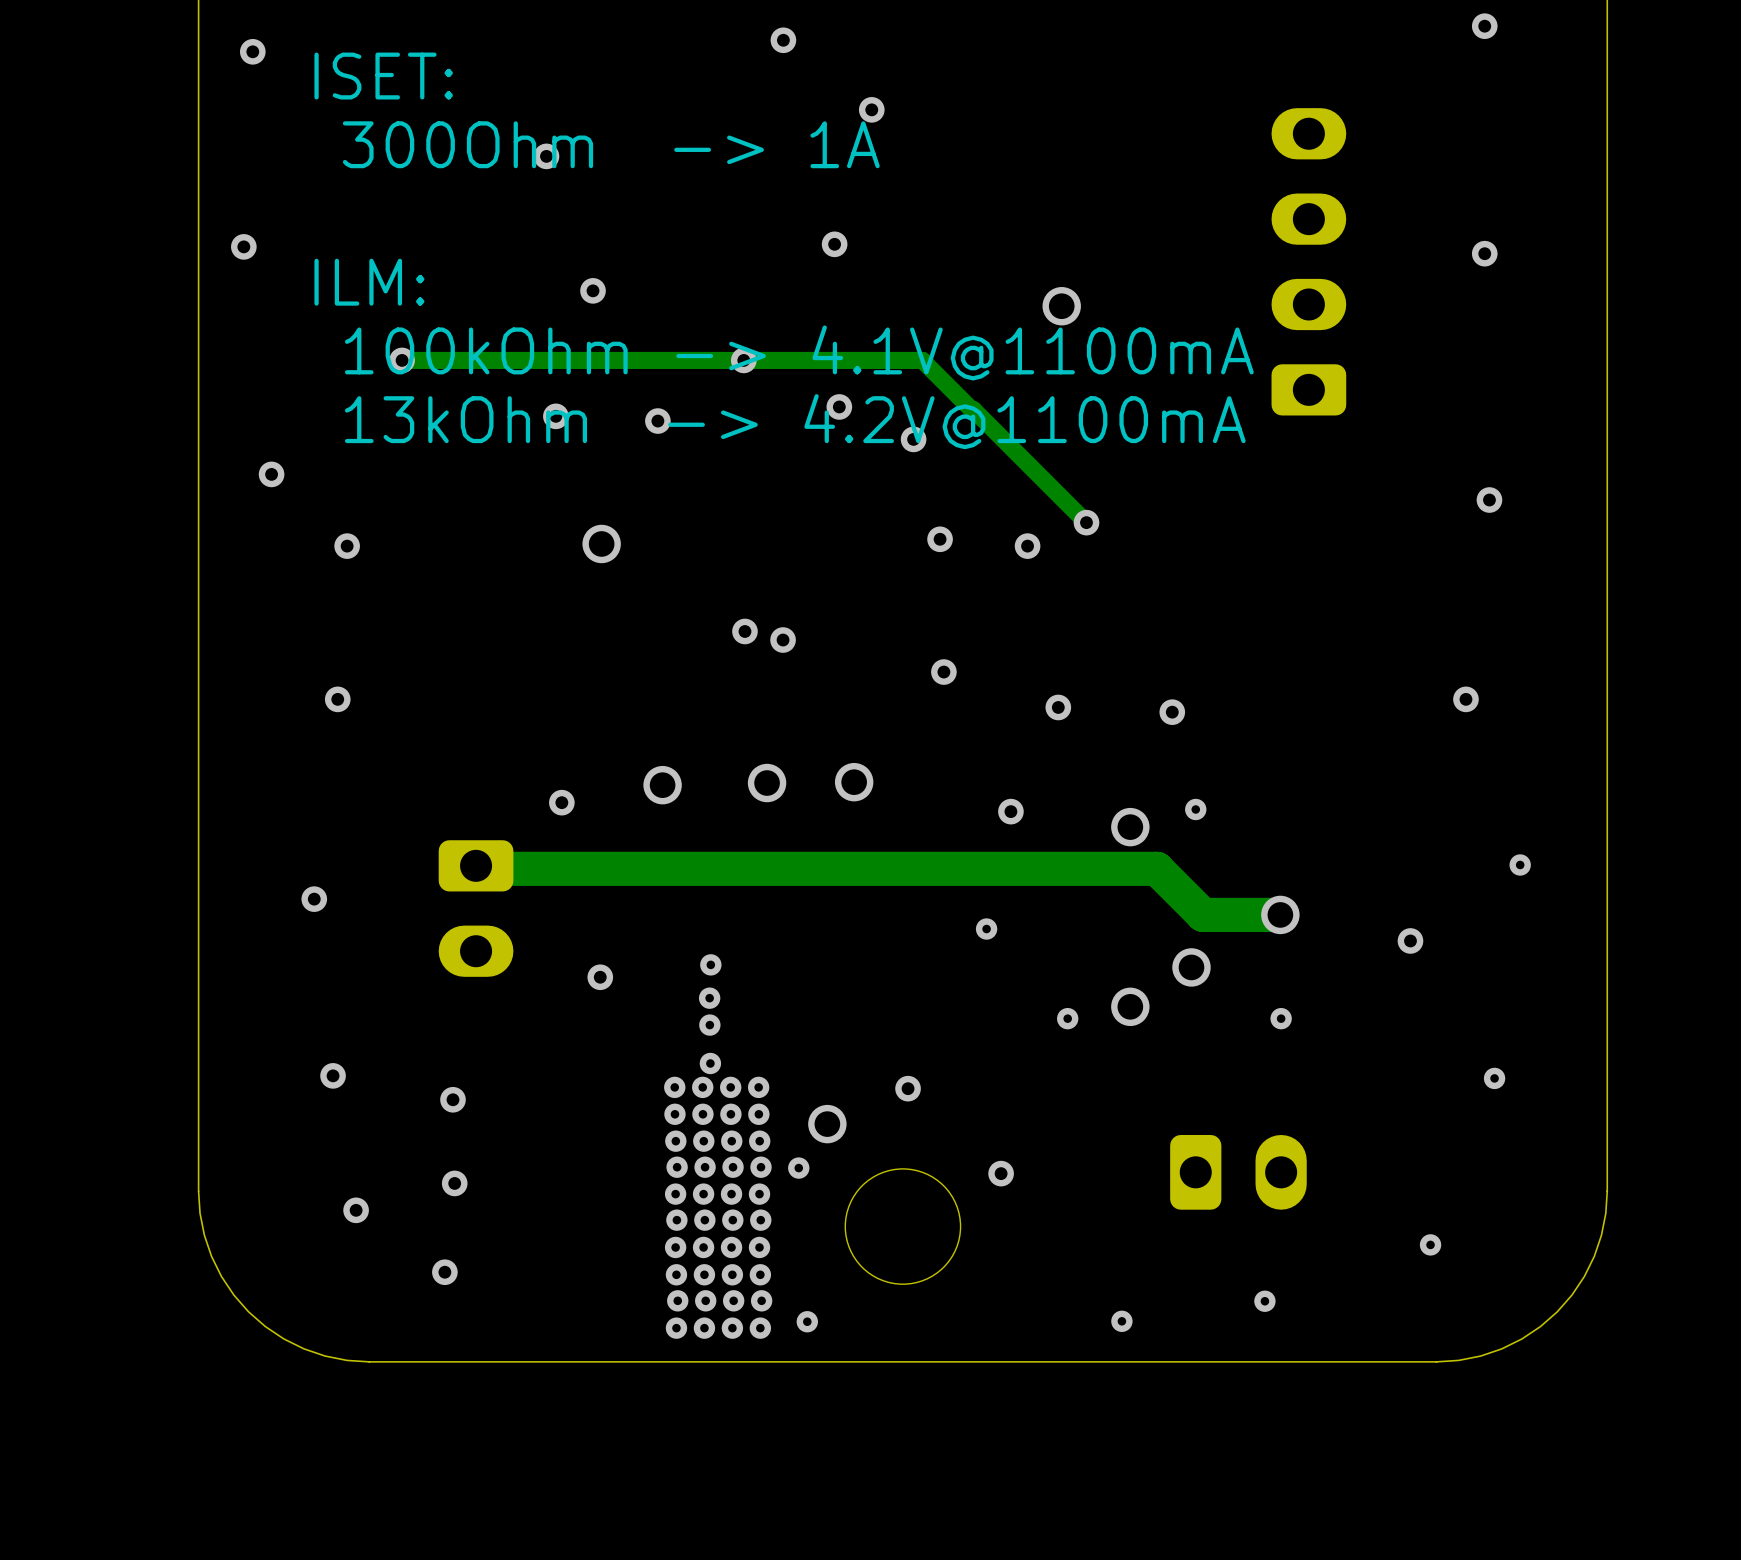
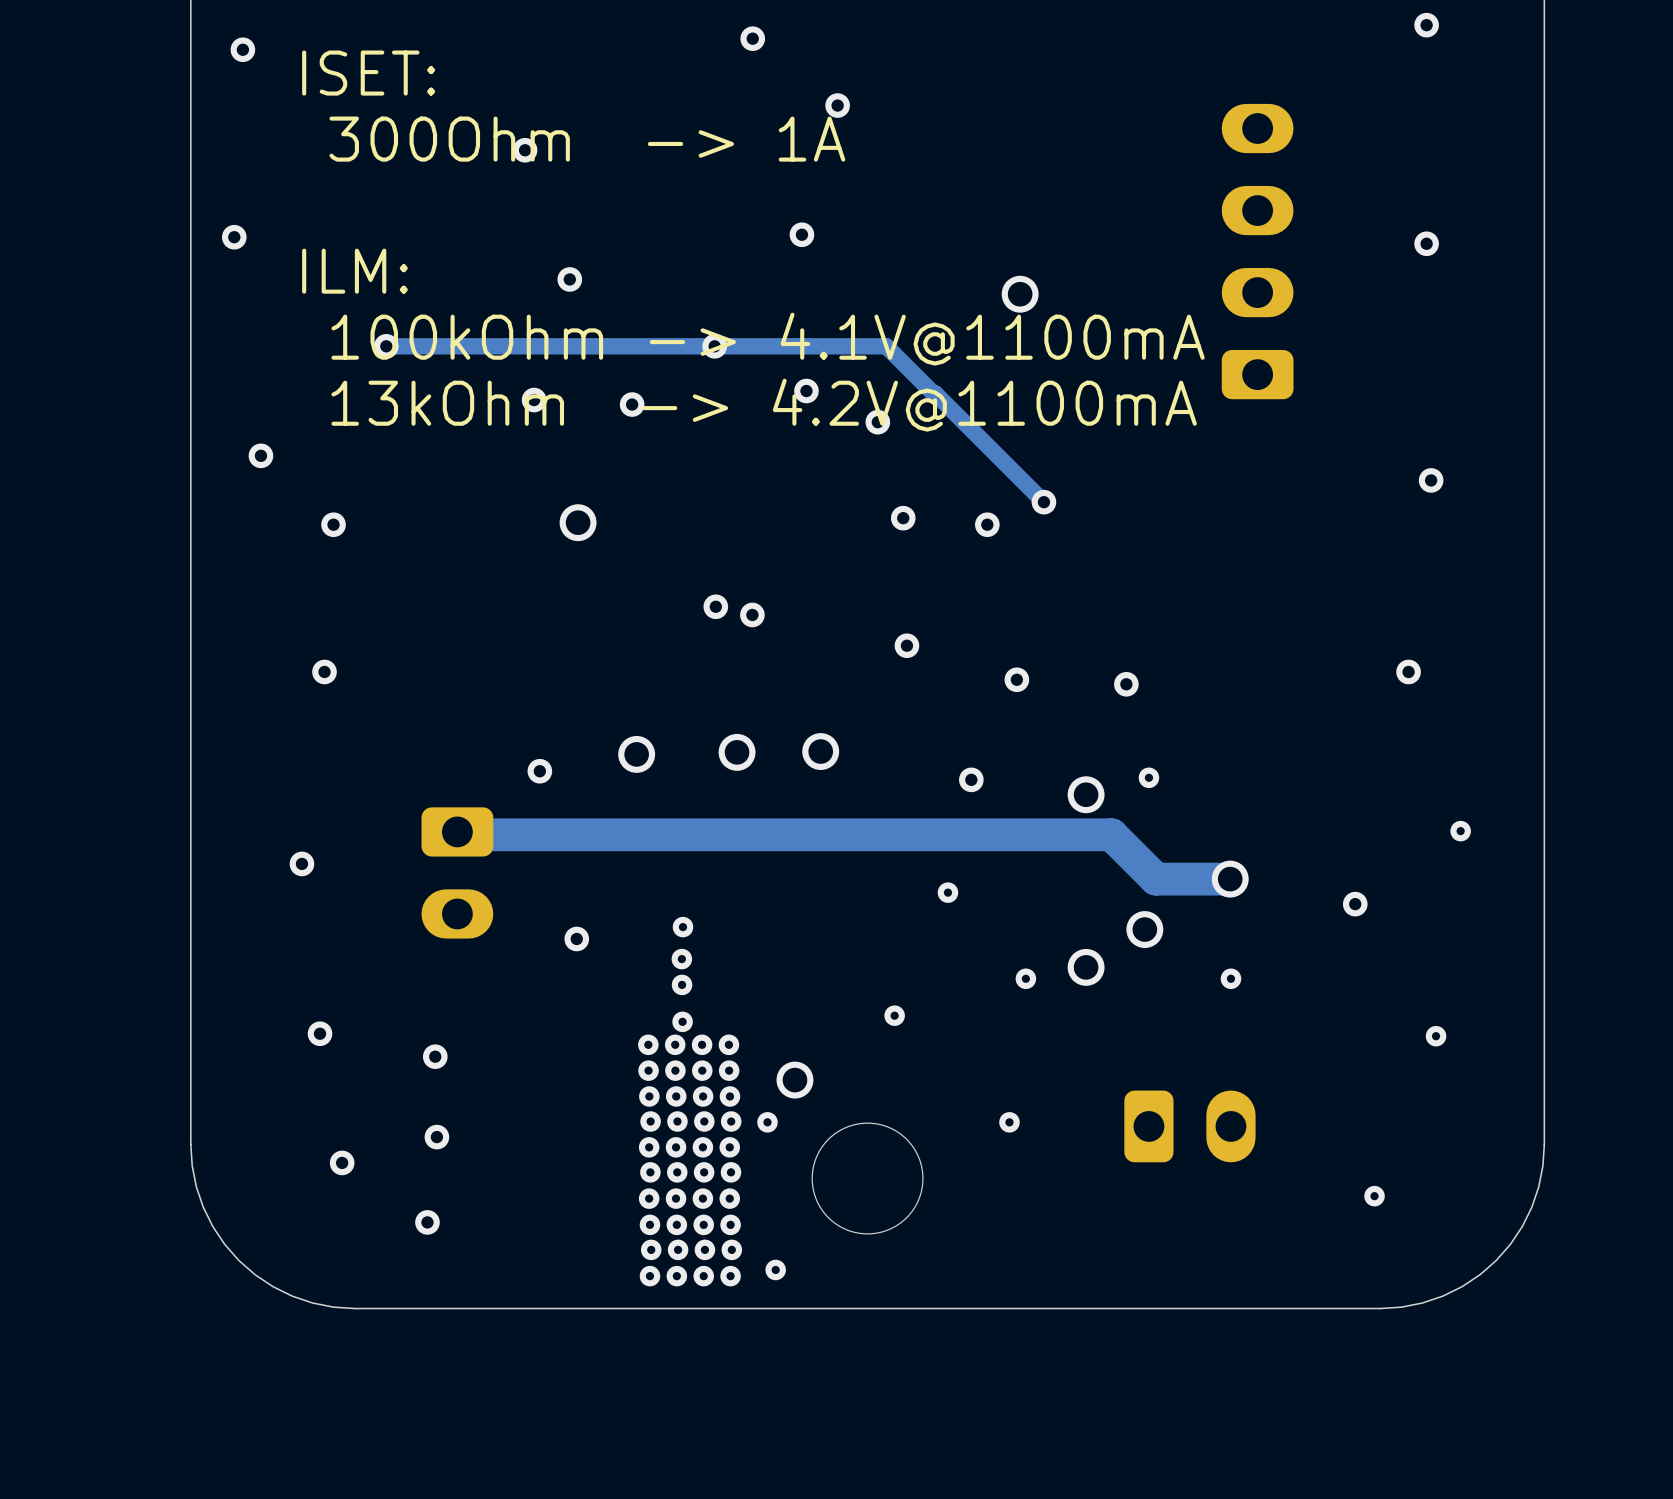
via: none -> (894, 1015)
via: (908, 1088) -> none
via: none -> (1009, 1122)
via: (1001, 1173) -> none
via: (1264, 1301) -> none
via: (1121, 1321) -> none

